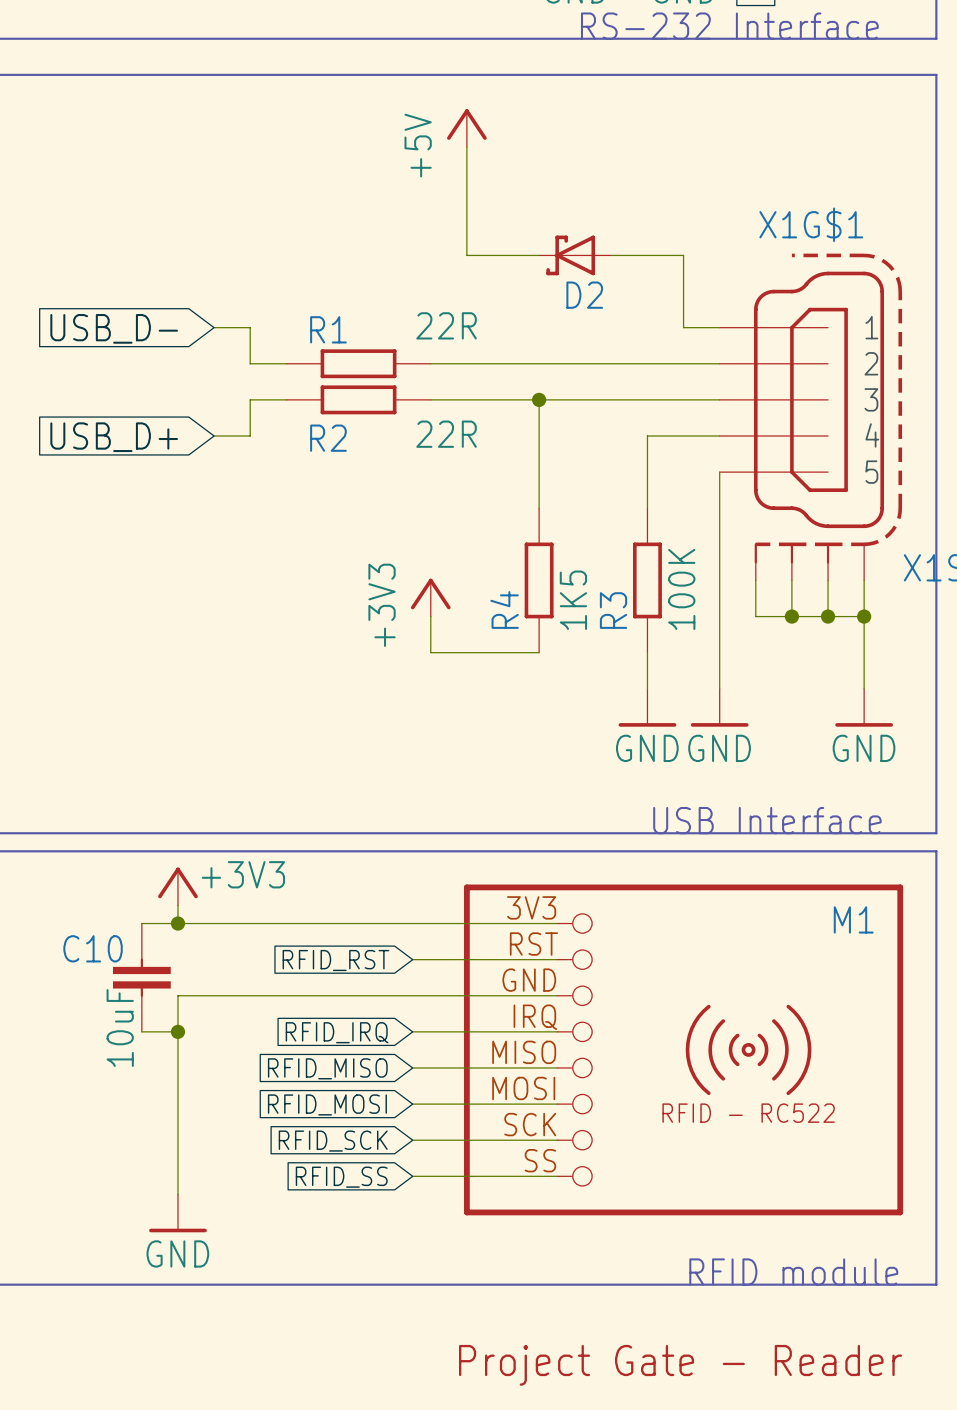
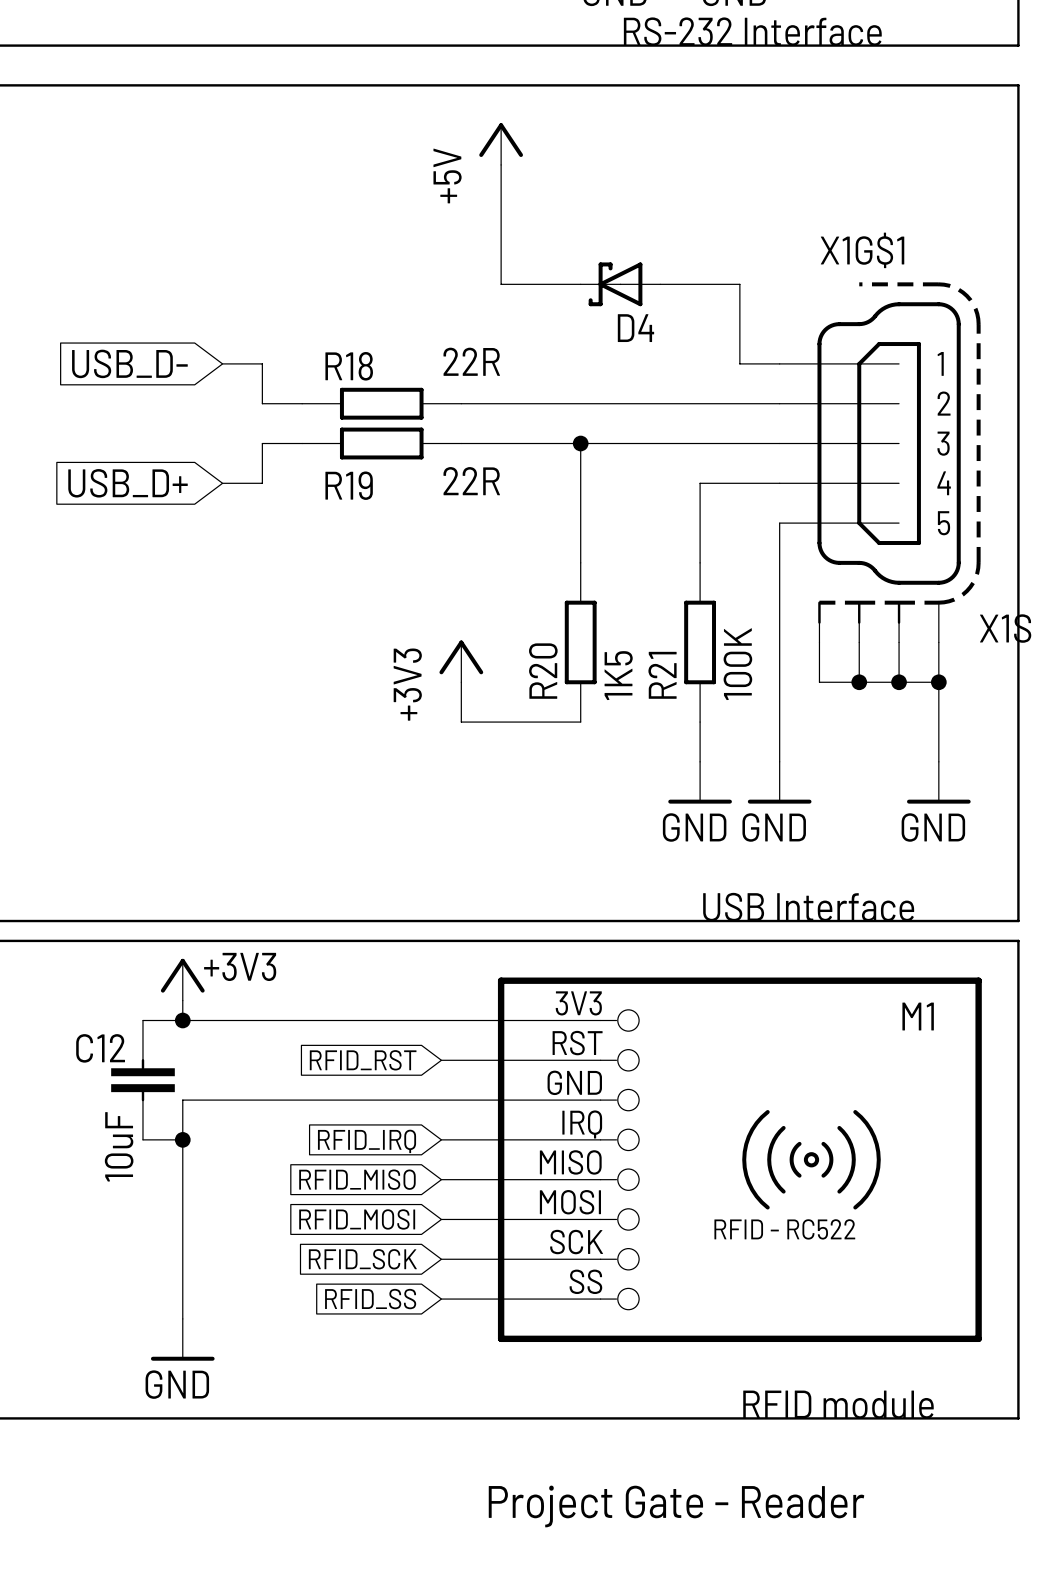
D2 name: D2 (584, 295) -> D4 (635, 328)
R1 name: R1 (328, 329) -> R18 (349, 366)
R2 name: R2 (328, 438) -> R19 (349, 485)
R4 name: R4 (504, 610) -> R20 (543, 671)
R3 name: R3 (613, 610) -> R21 (662, 675)
C10 name: C10 (93, 948) -> C12 (100, 1048)

